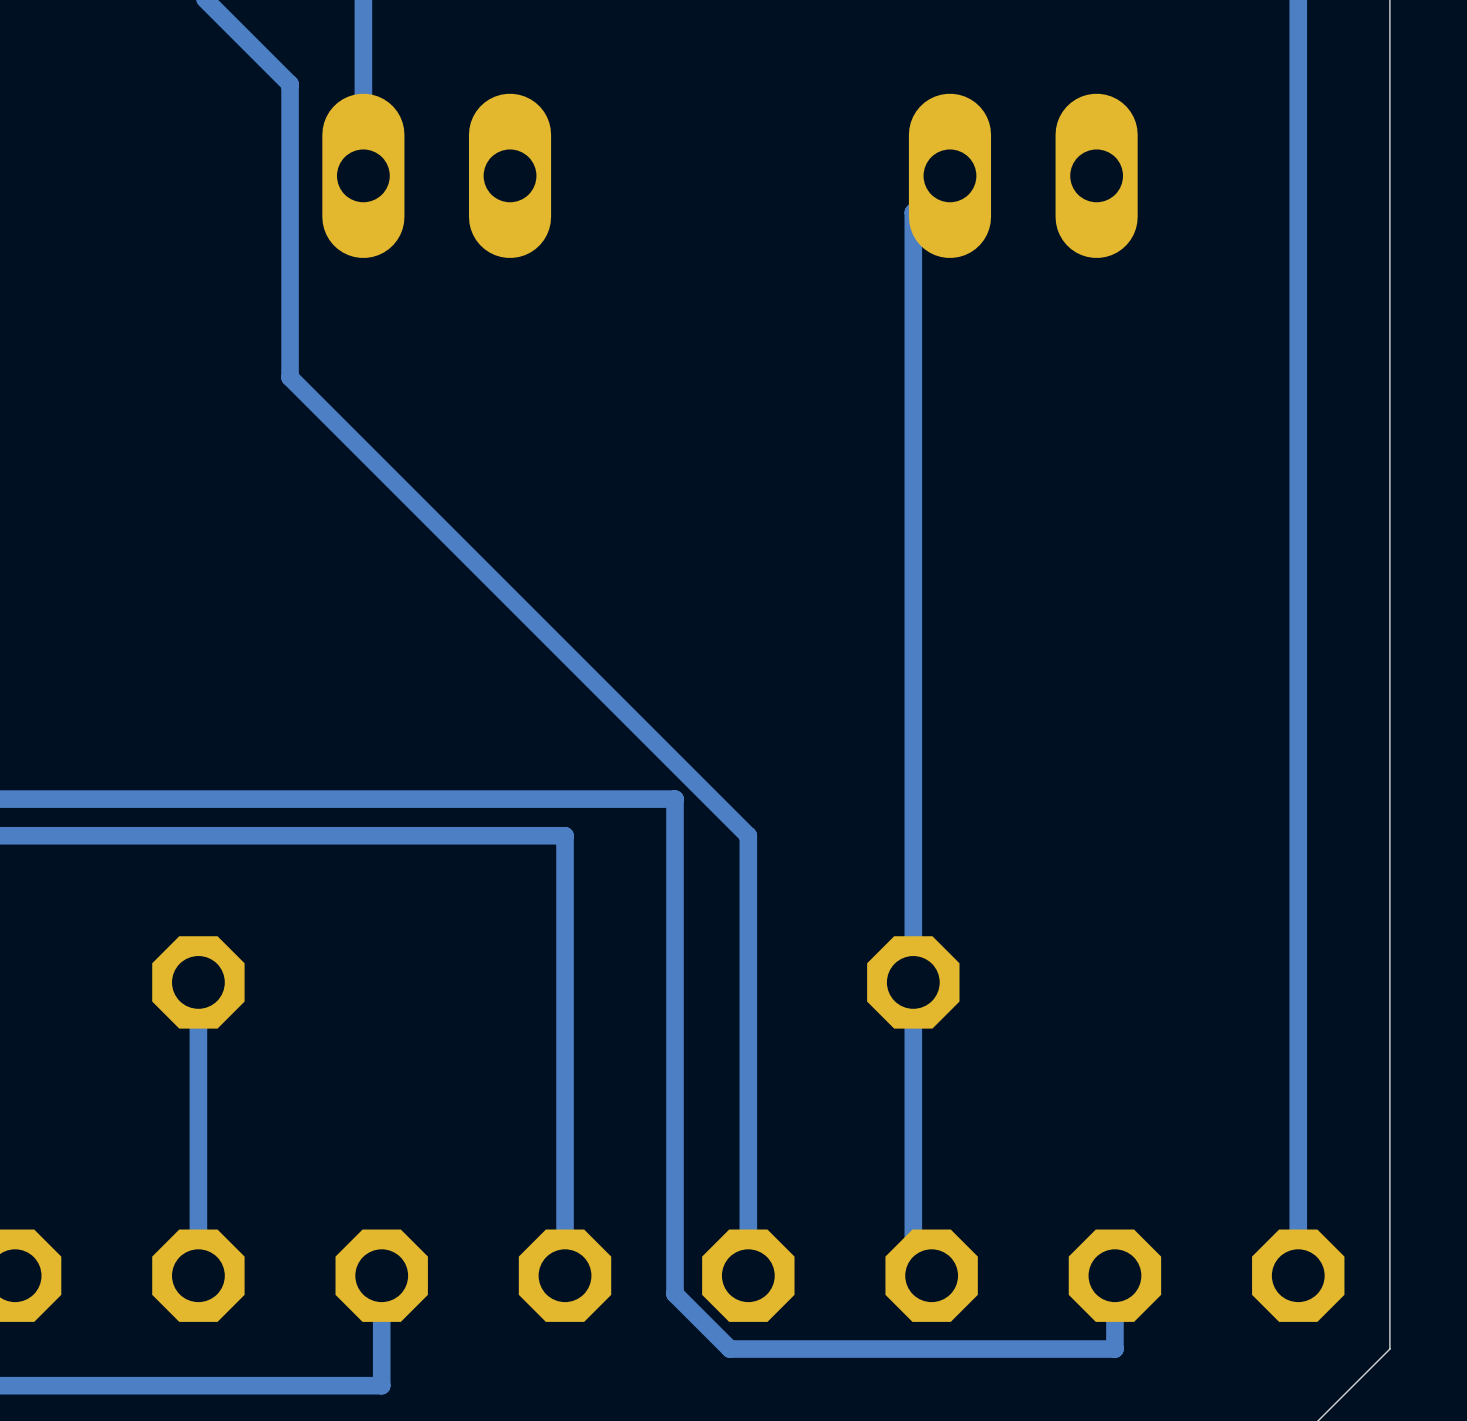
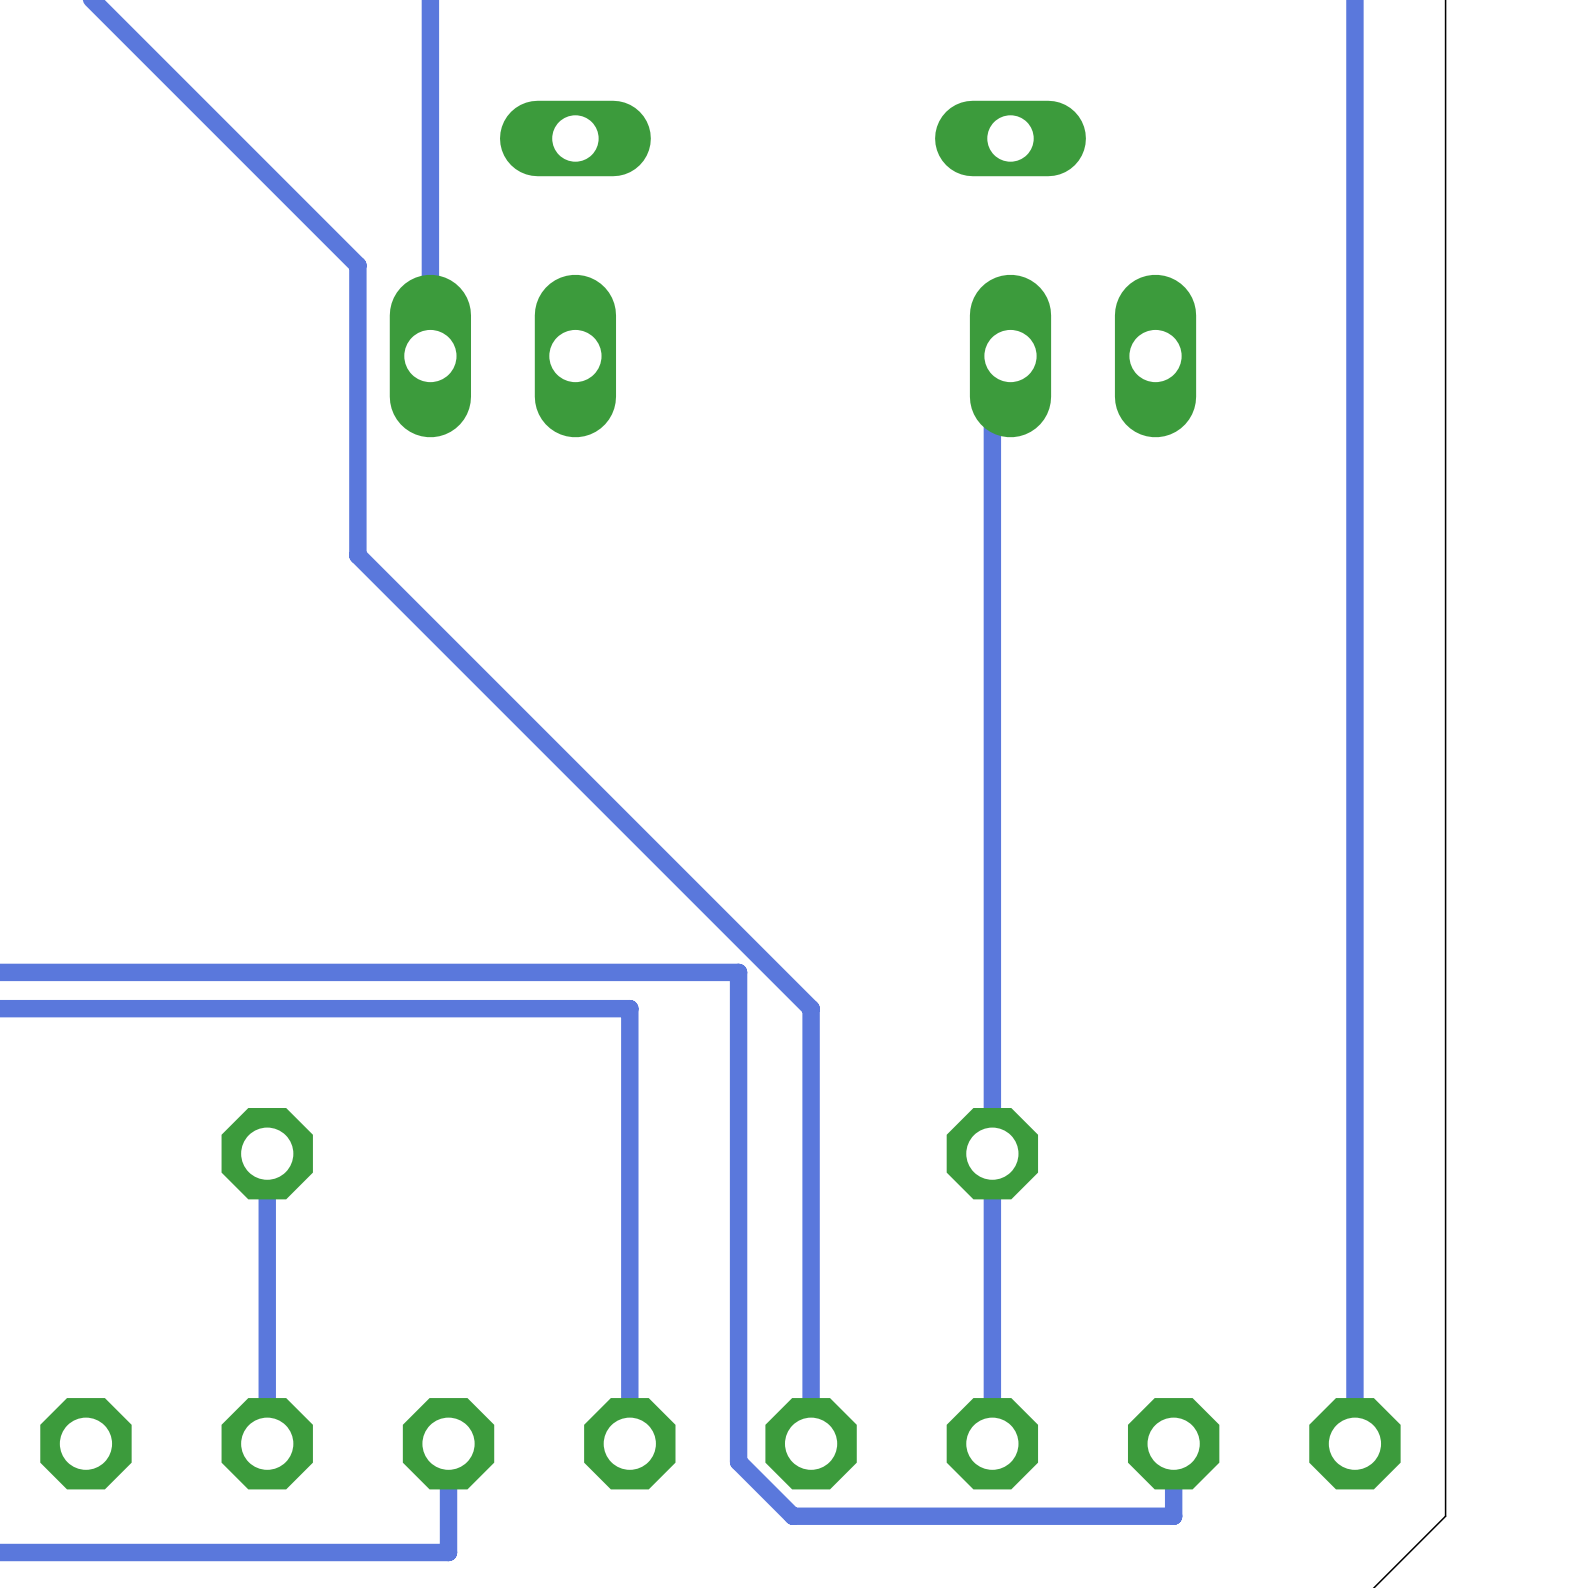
track: (931, 194) (913, 212) (913, 1257) (931, 1275) -> (992, 374) (992, 1443)
part position: (913, 982) -> (992, 1153)

